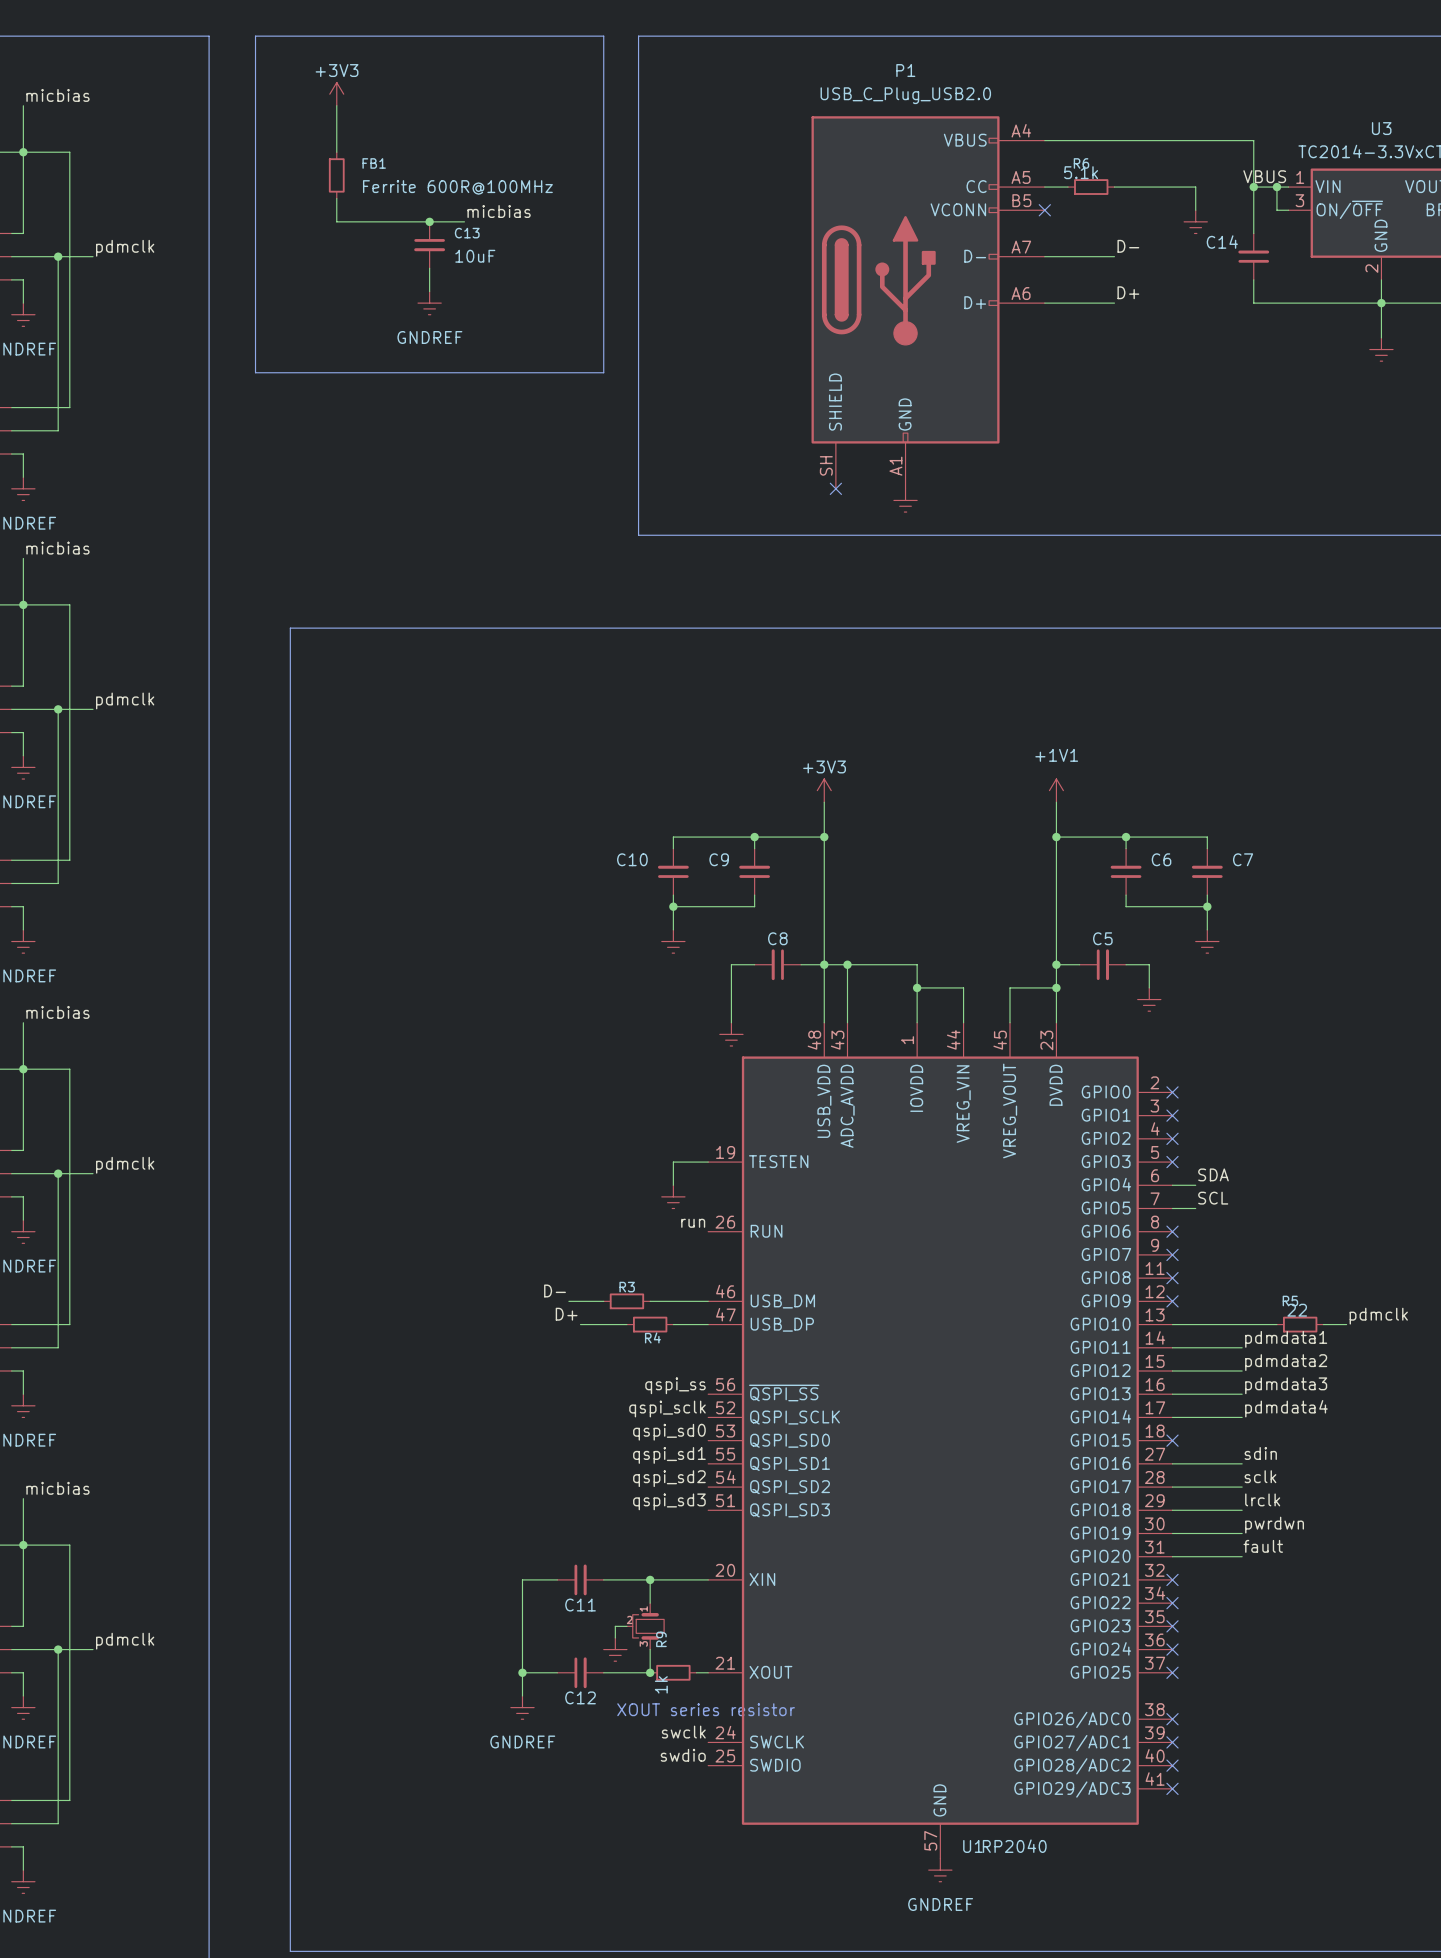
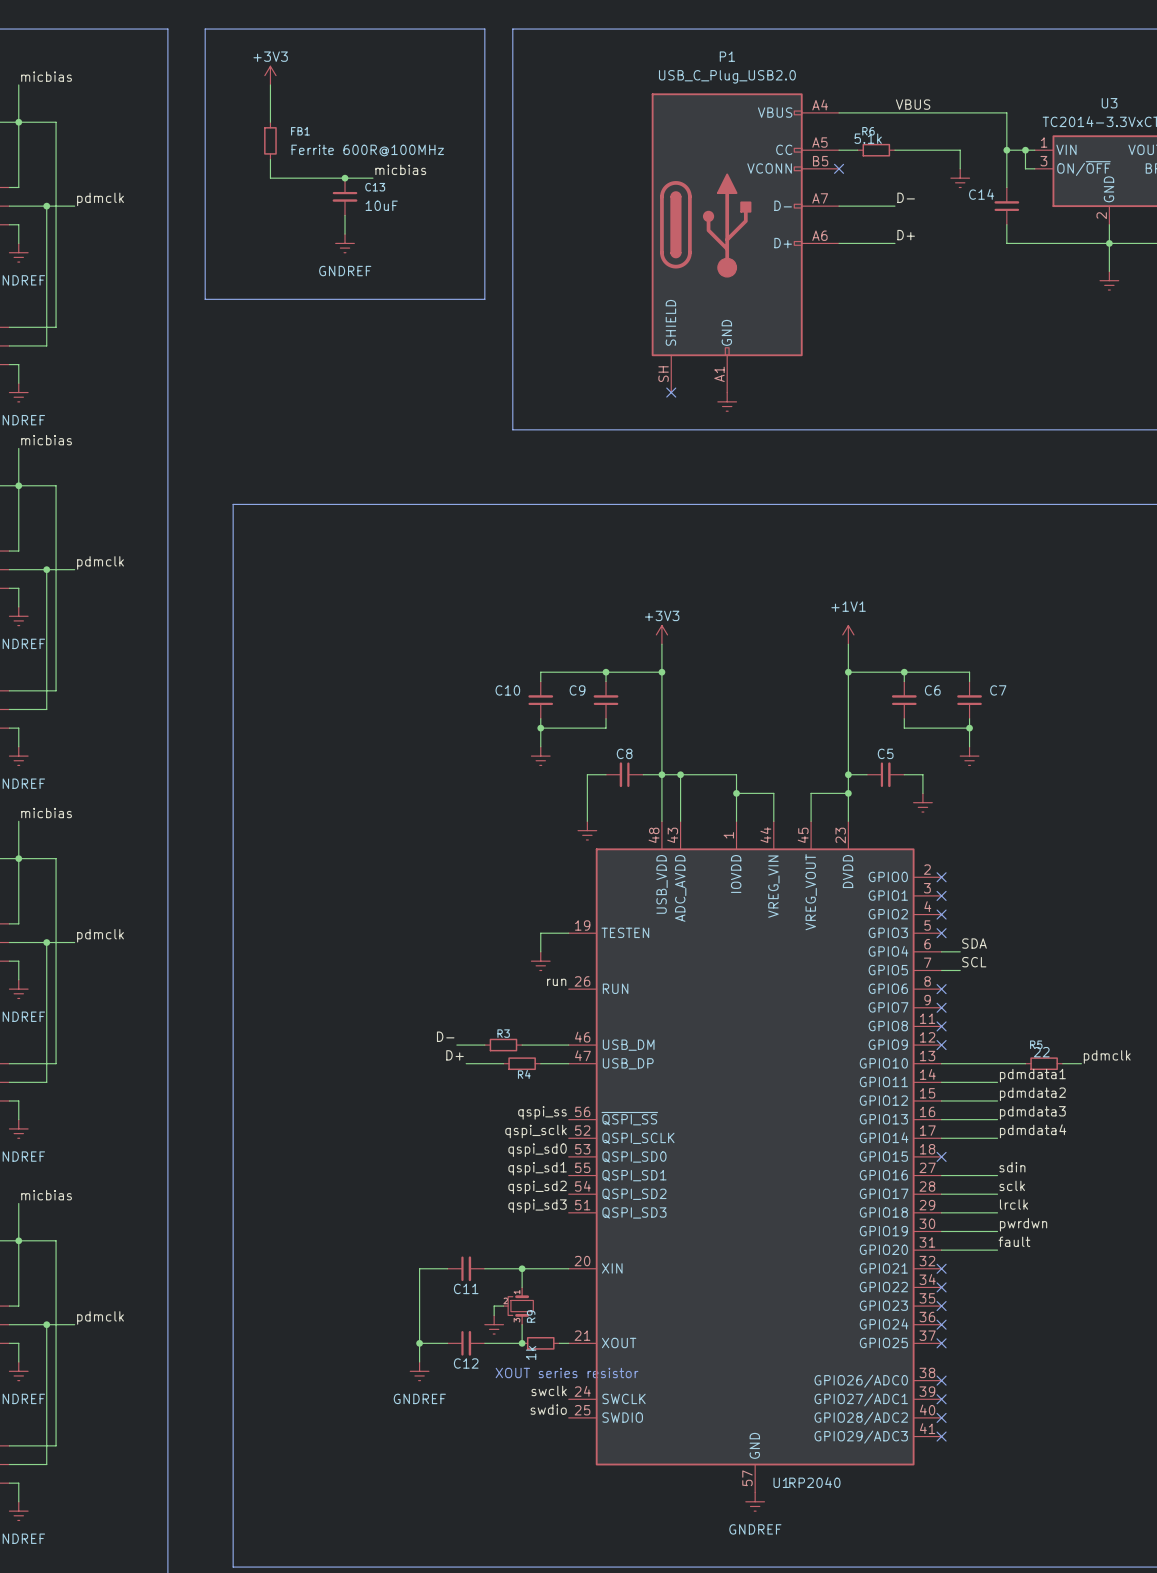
label position: VBUS (1264, 176) -> VBUS (913, 104)

